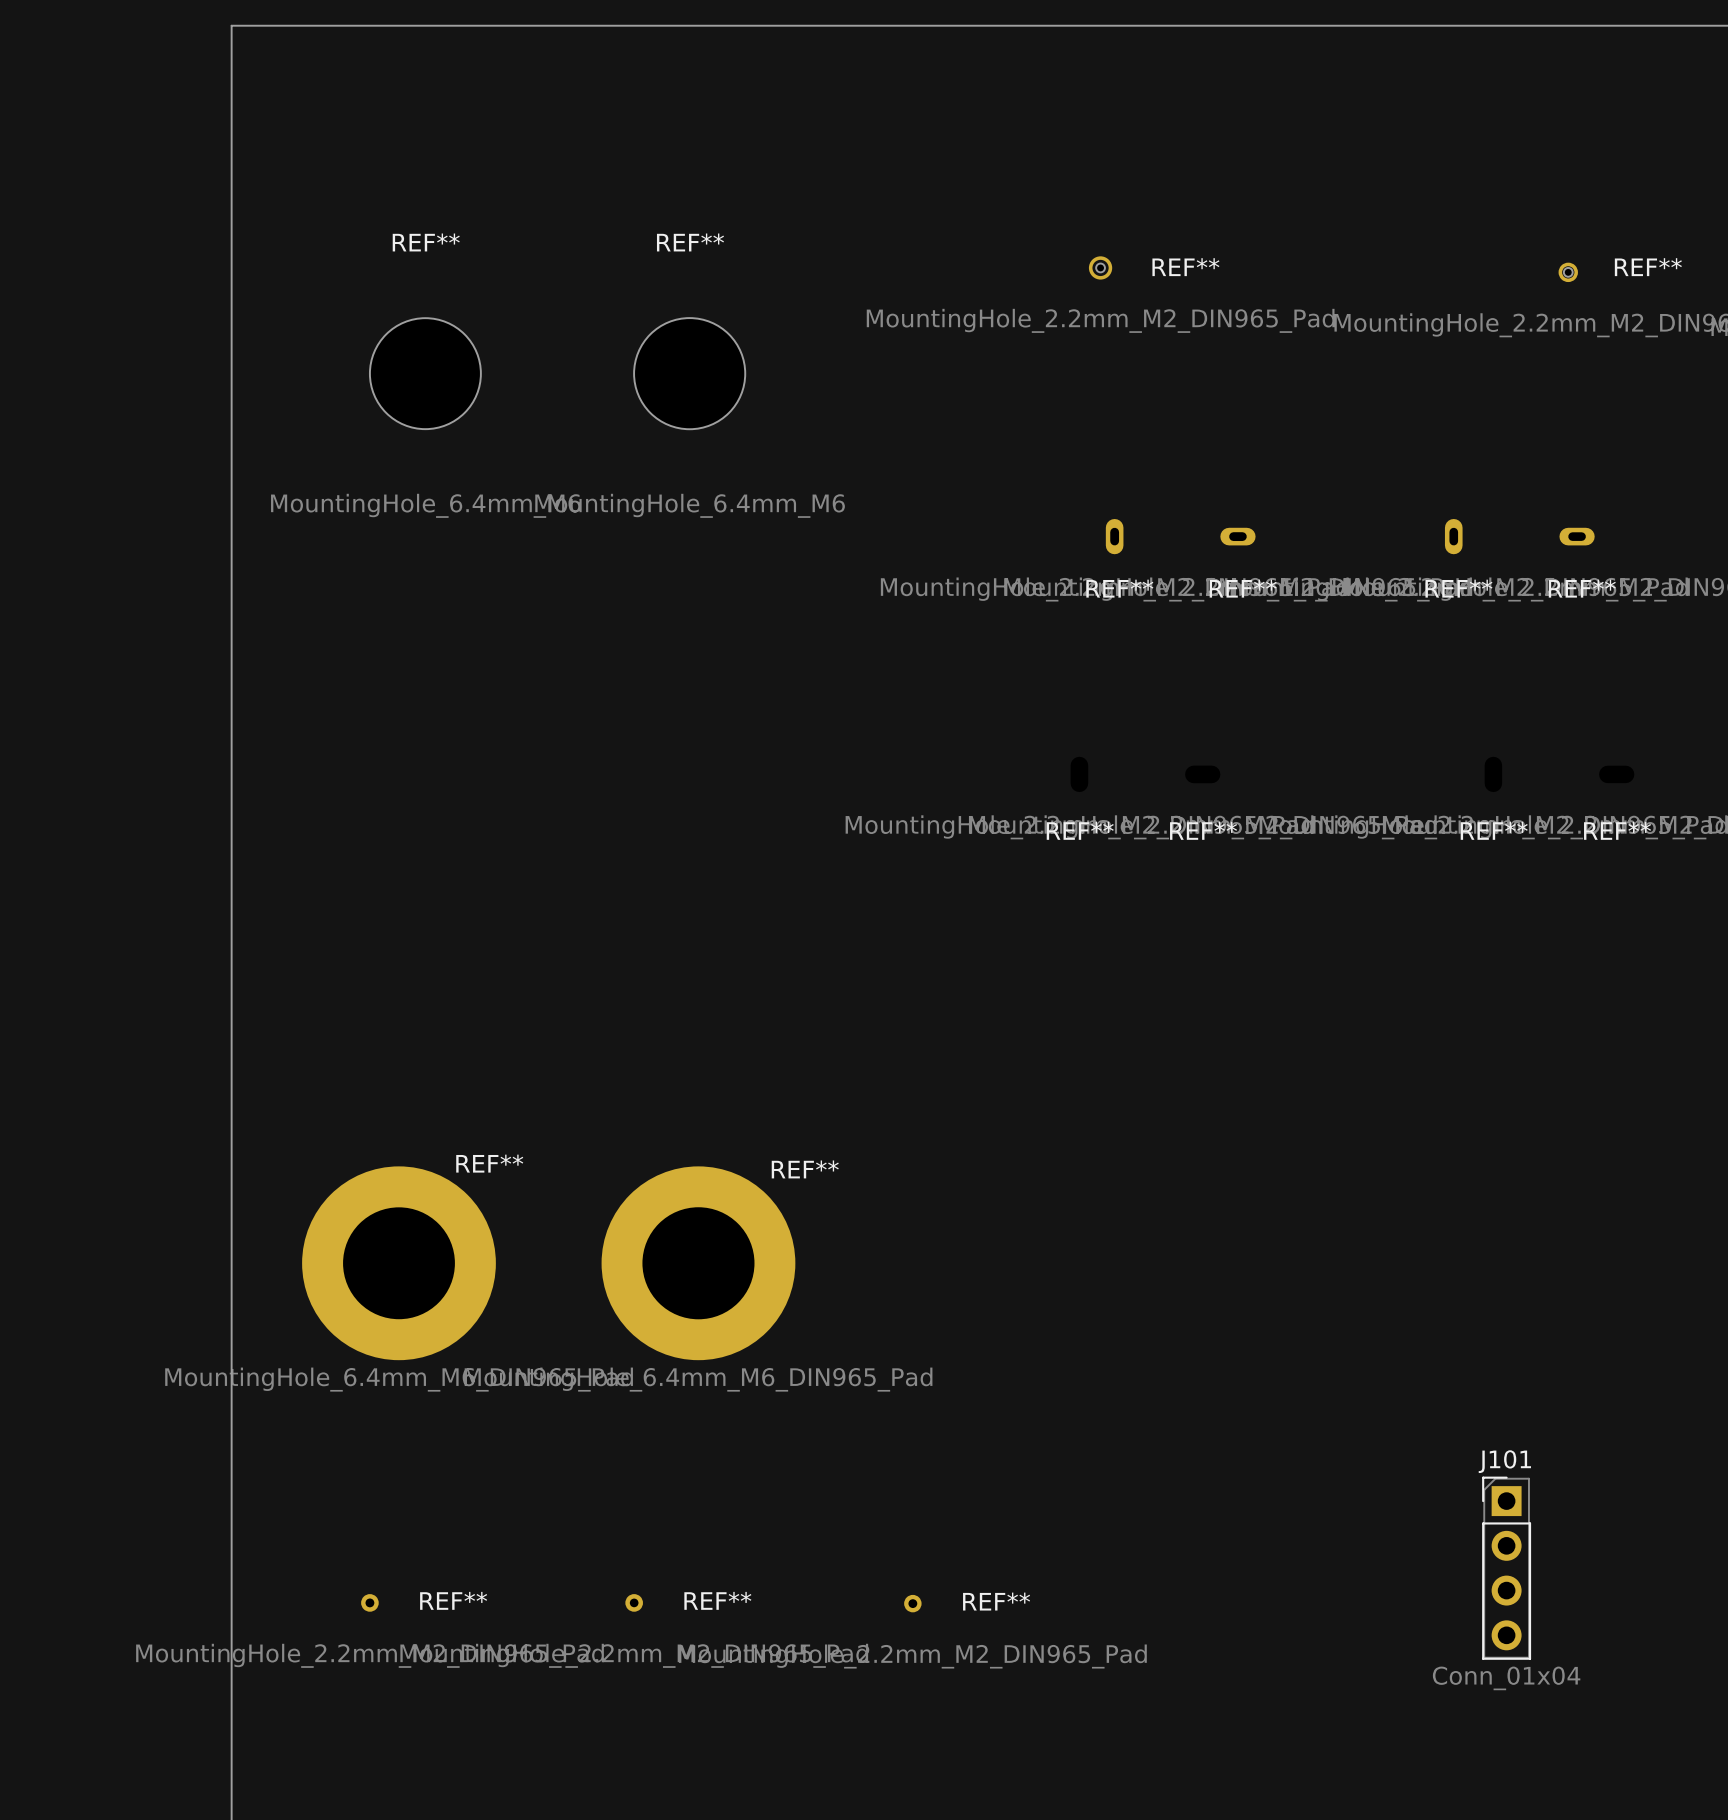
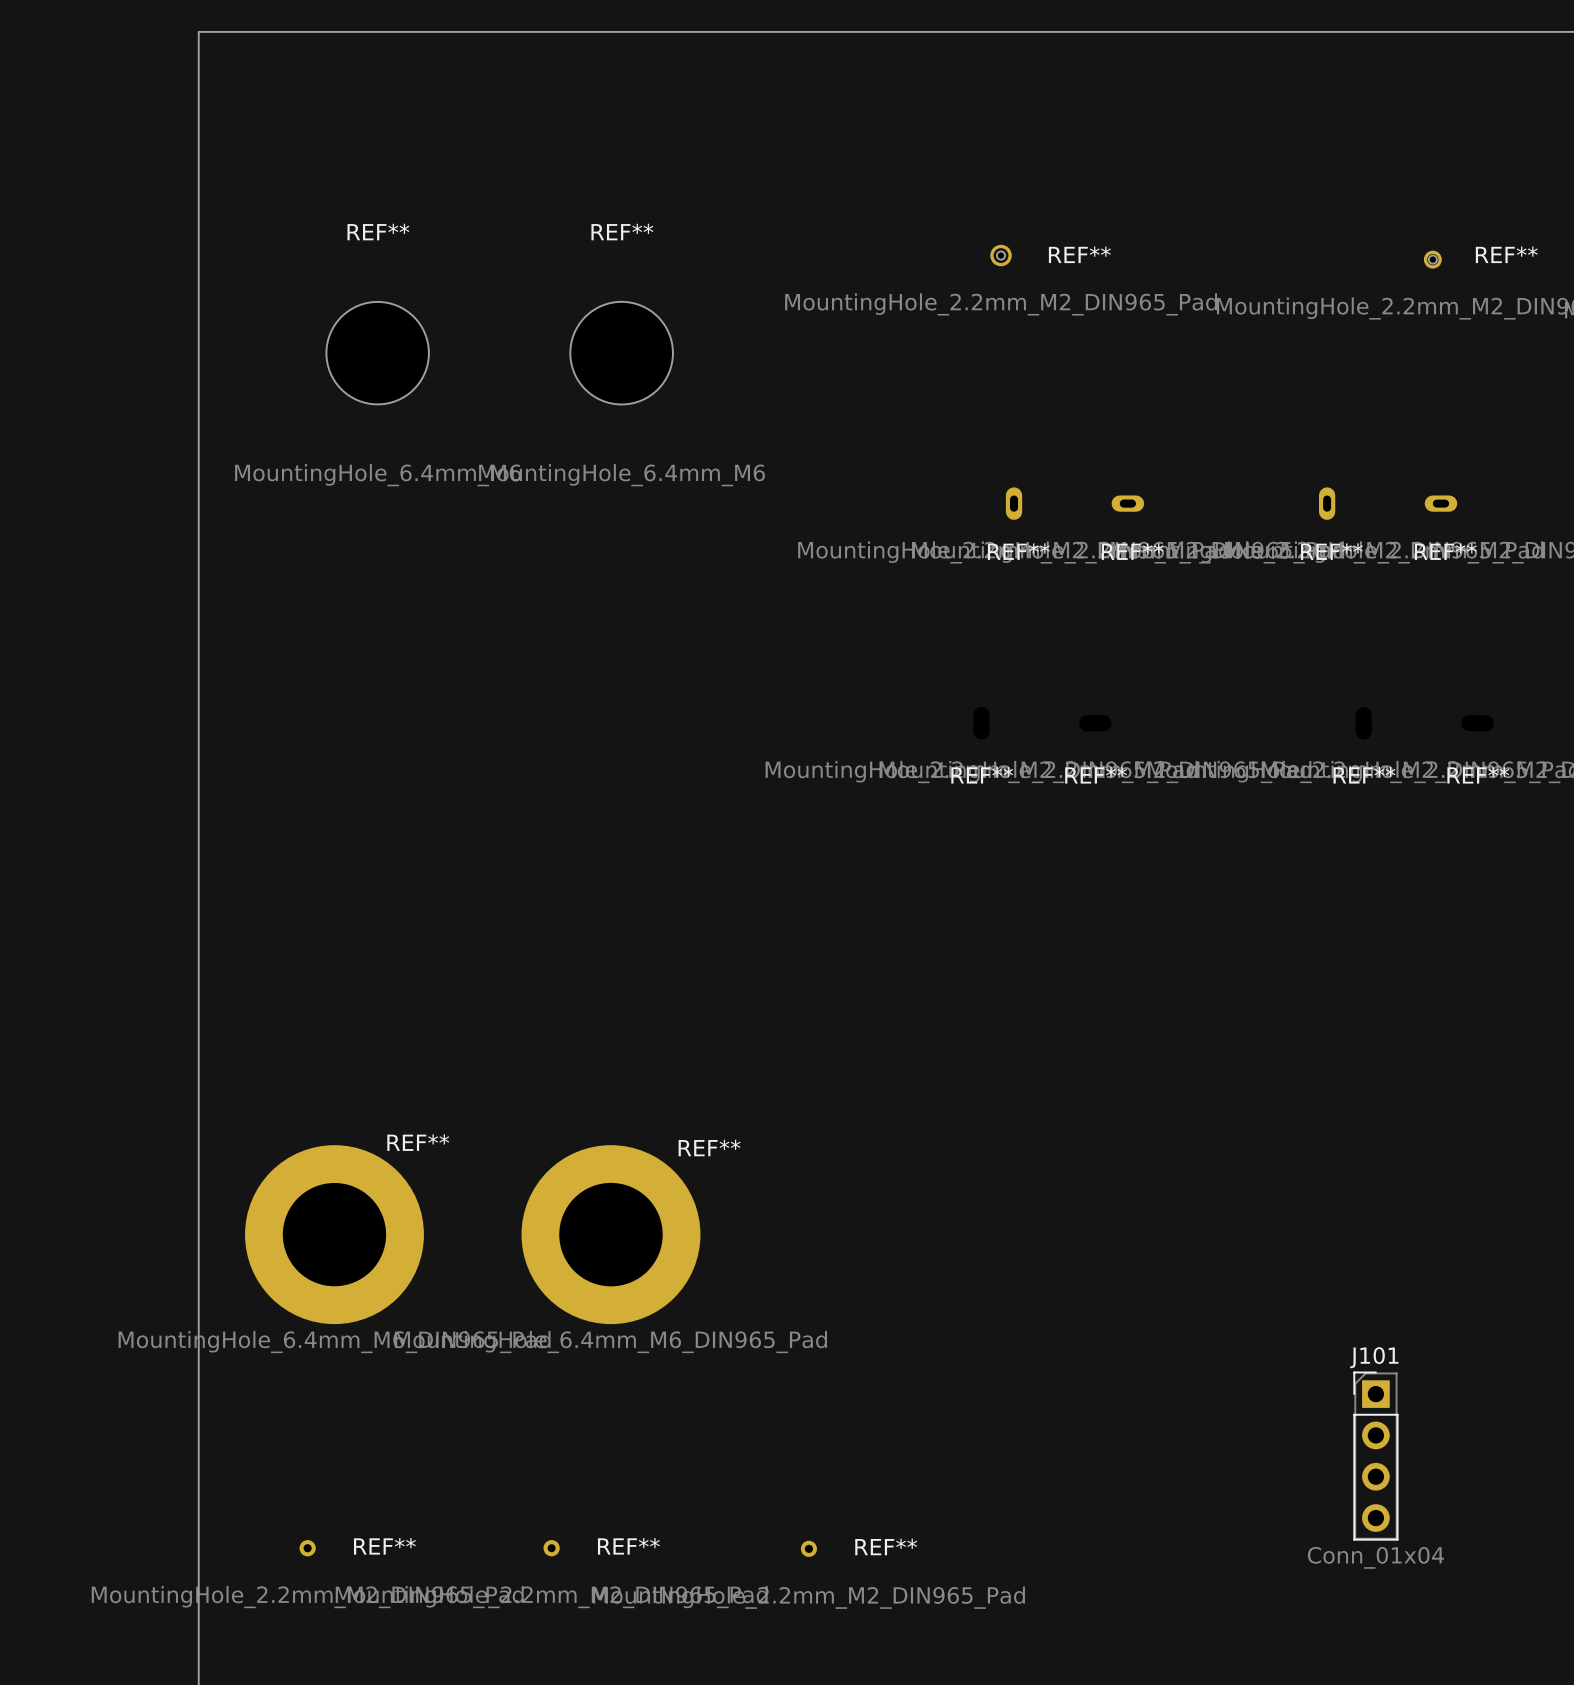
REF** position: (398, 1263) -> (334, 1234)
REF** position: (698, 1263) -> (610, 1234)
REF** position: (369, 1602) -> (307, 1548)
REF** position: (634, 1602) -> (551, 1548)
REF** position: (912, 1603) -> (808, 1548)

